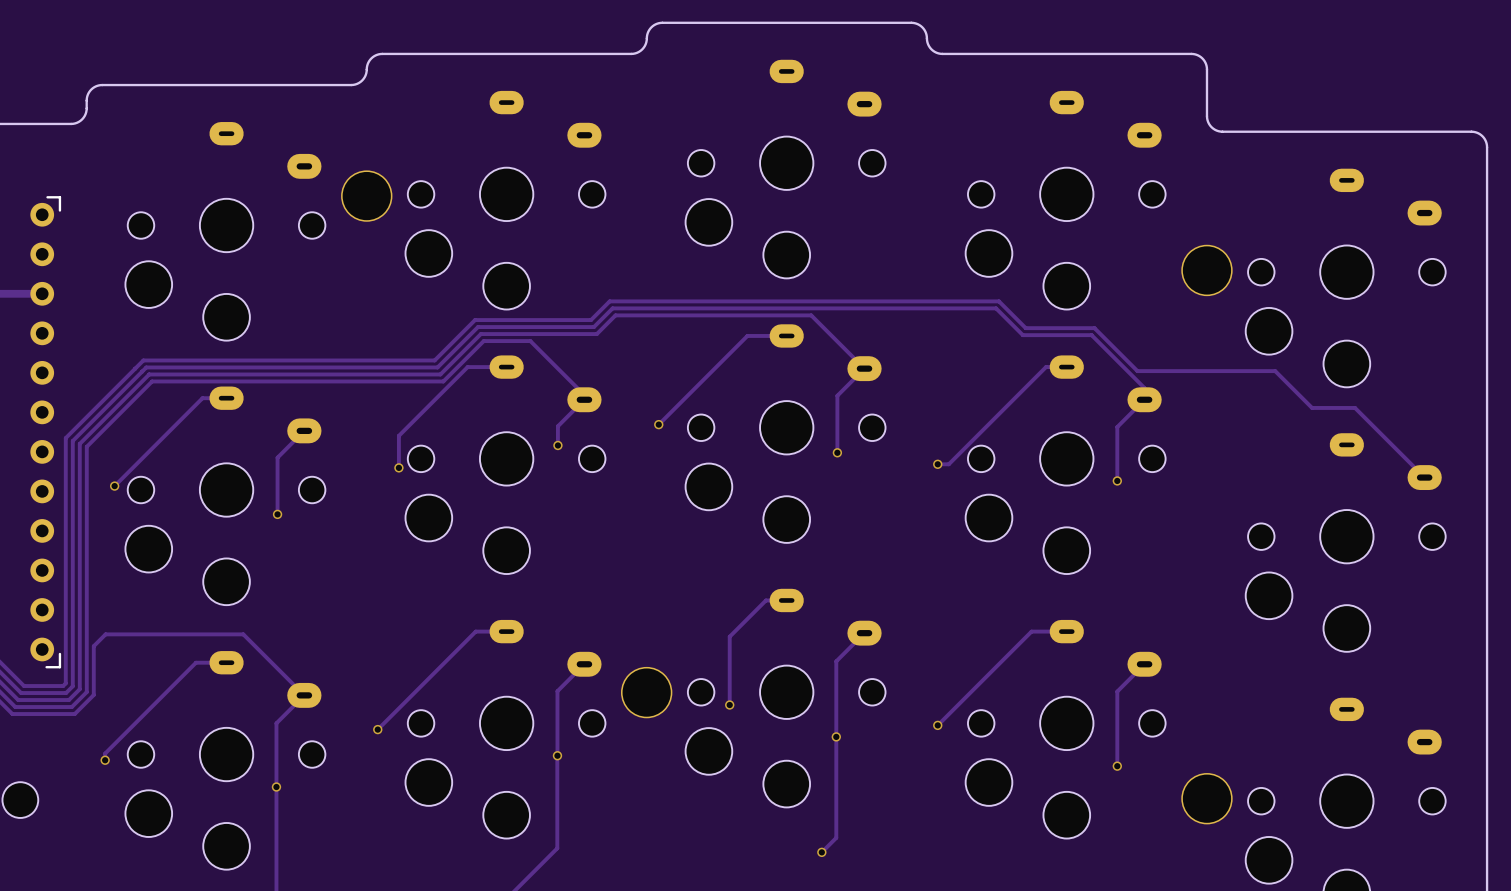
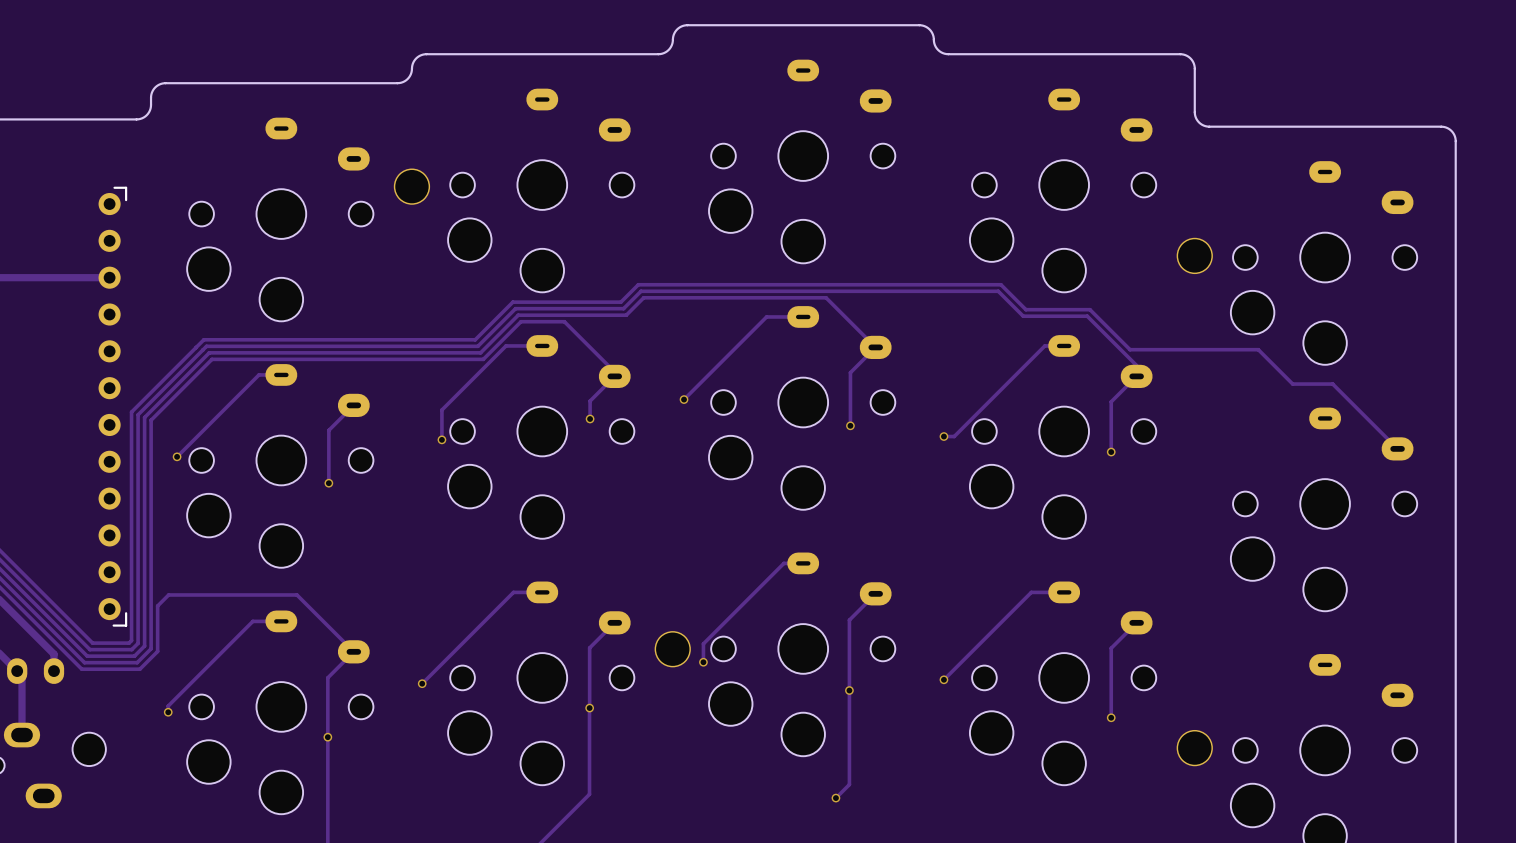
part footprint: [341, 170, 393, 222] -> [393, 168, 431, 205]
part footprint: [1181, 244, 1233, 297] -> [1176, 237, 1213, 275]
track: (729, 636) (729, 705) -> (750, 597) (703, 643) (703, 662)
part footprint: [621, 666, 673, 719] -> [654, 631, 691, 668]
via position: (729, 705) -> (703, 662)
part footprint: [1181, 773, 1233, 825] -> [1176, 729, 1213, 767]

